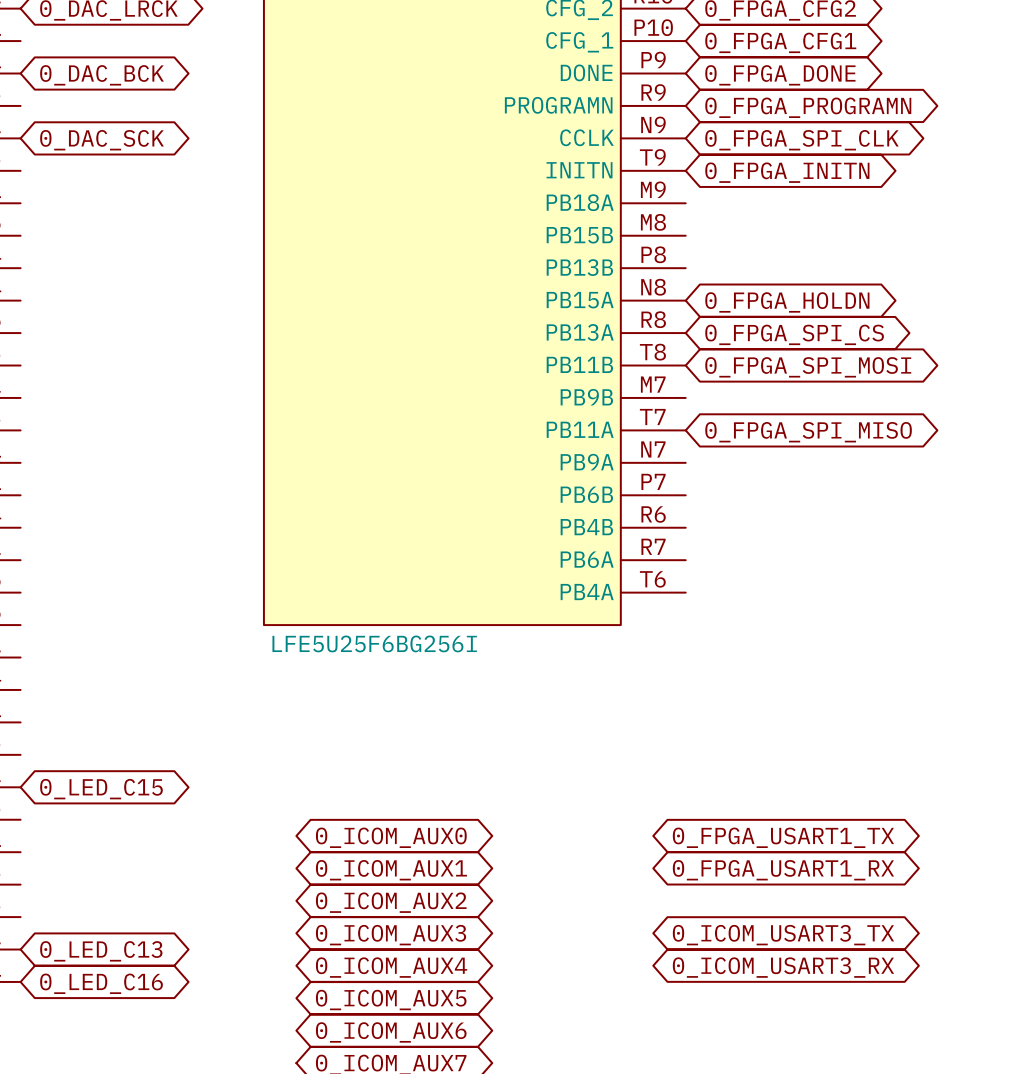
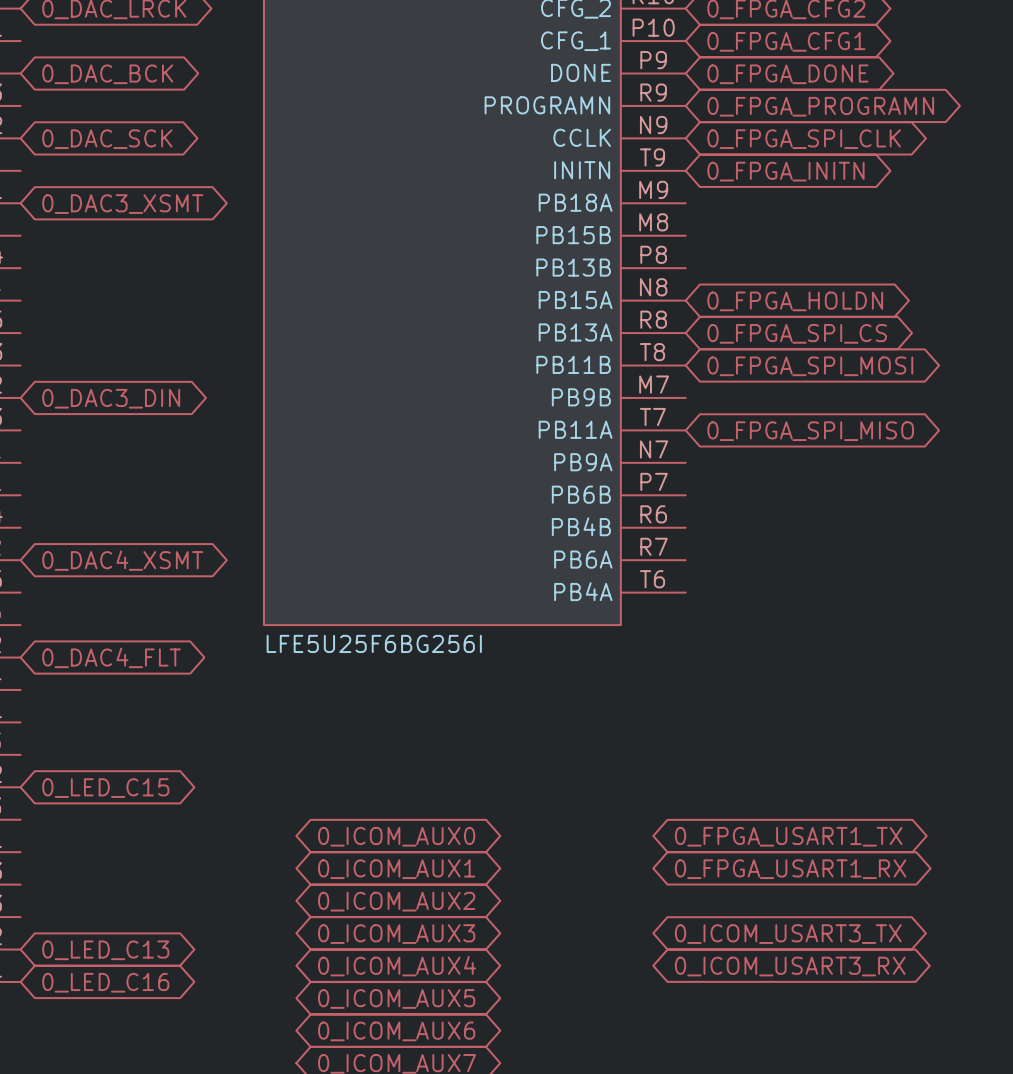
global label: none -> 0_DAC3_XSMT (122, 204)
global label: none -> 0_DAC3_DIN (111, 398)
global label: none -> 0_DAC4_XSMT (122, 560)
global label: none -> 0_DAC4_FLT (111, 657)

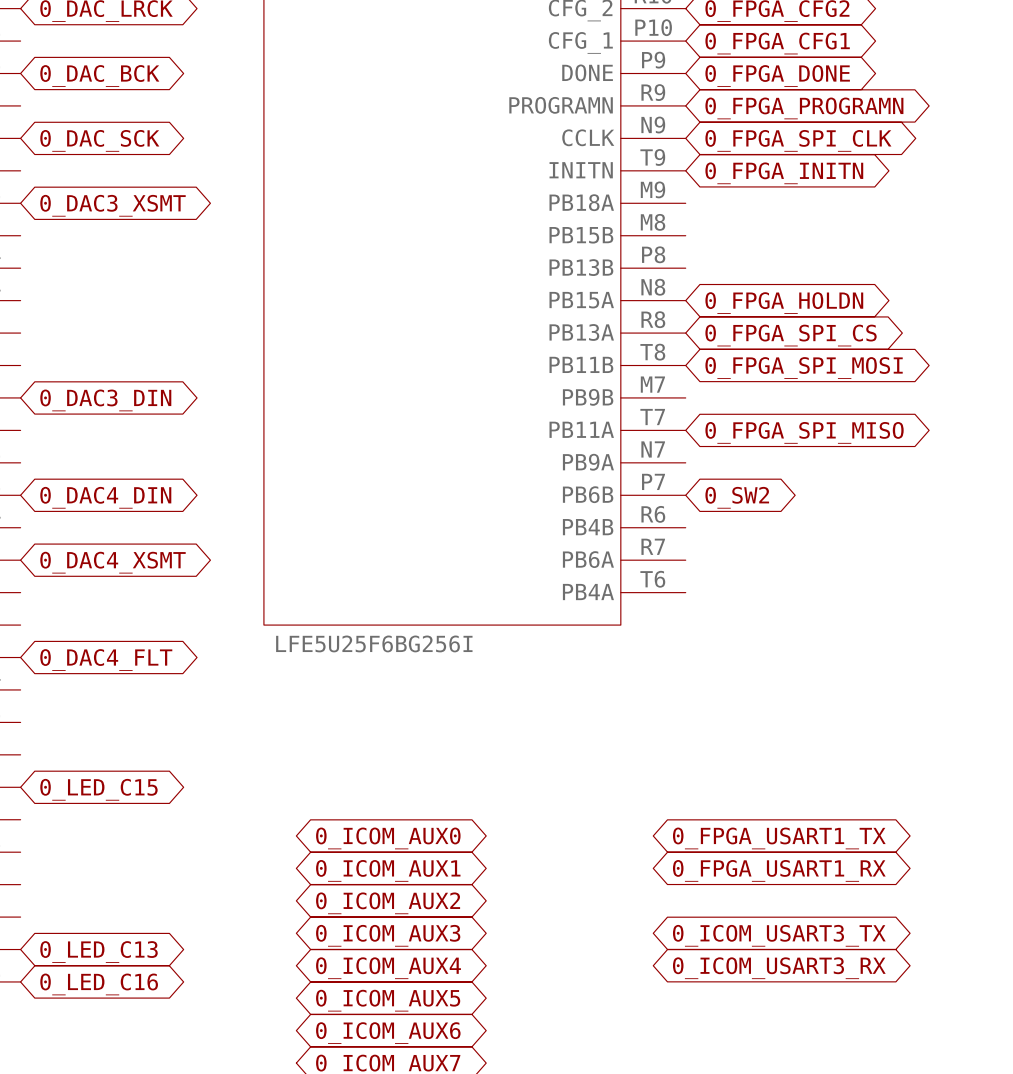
global label: none -> 0_DAC4_DIN (105, 497)
global label: none -> 0_SW2 (737, 497)

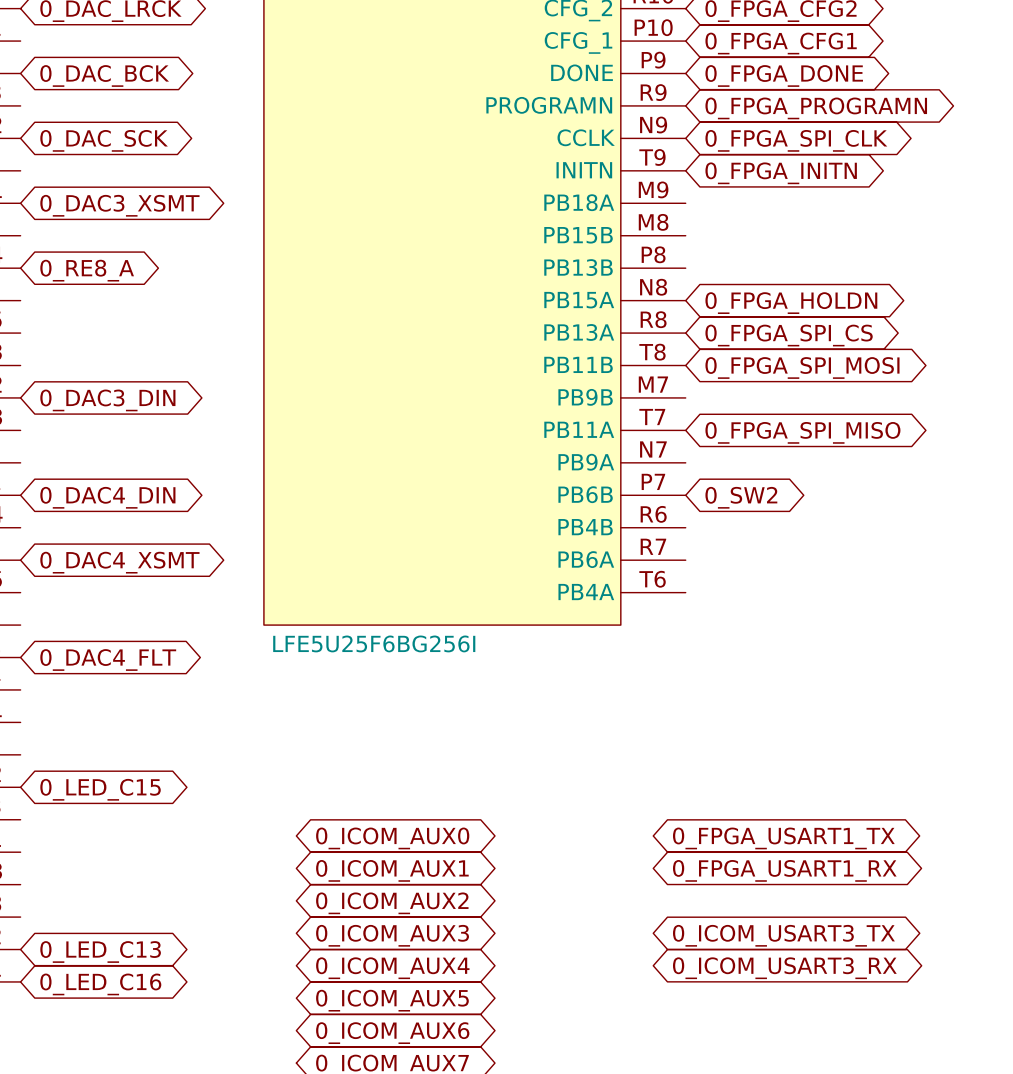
global label: none -> 0_RE8_A (87, 270)

